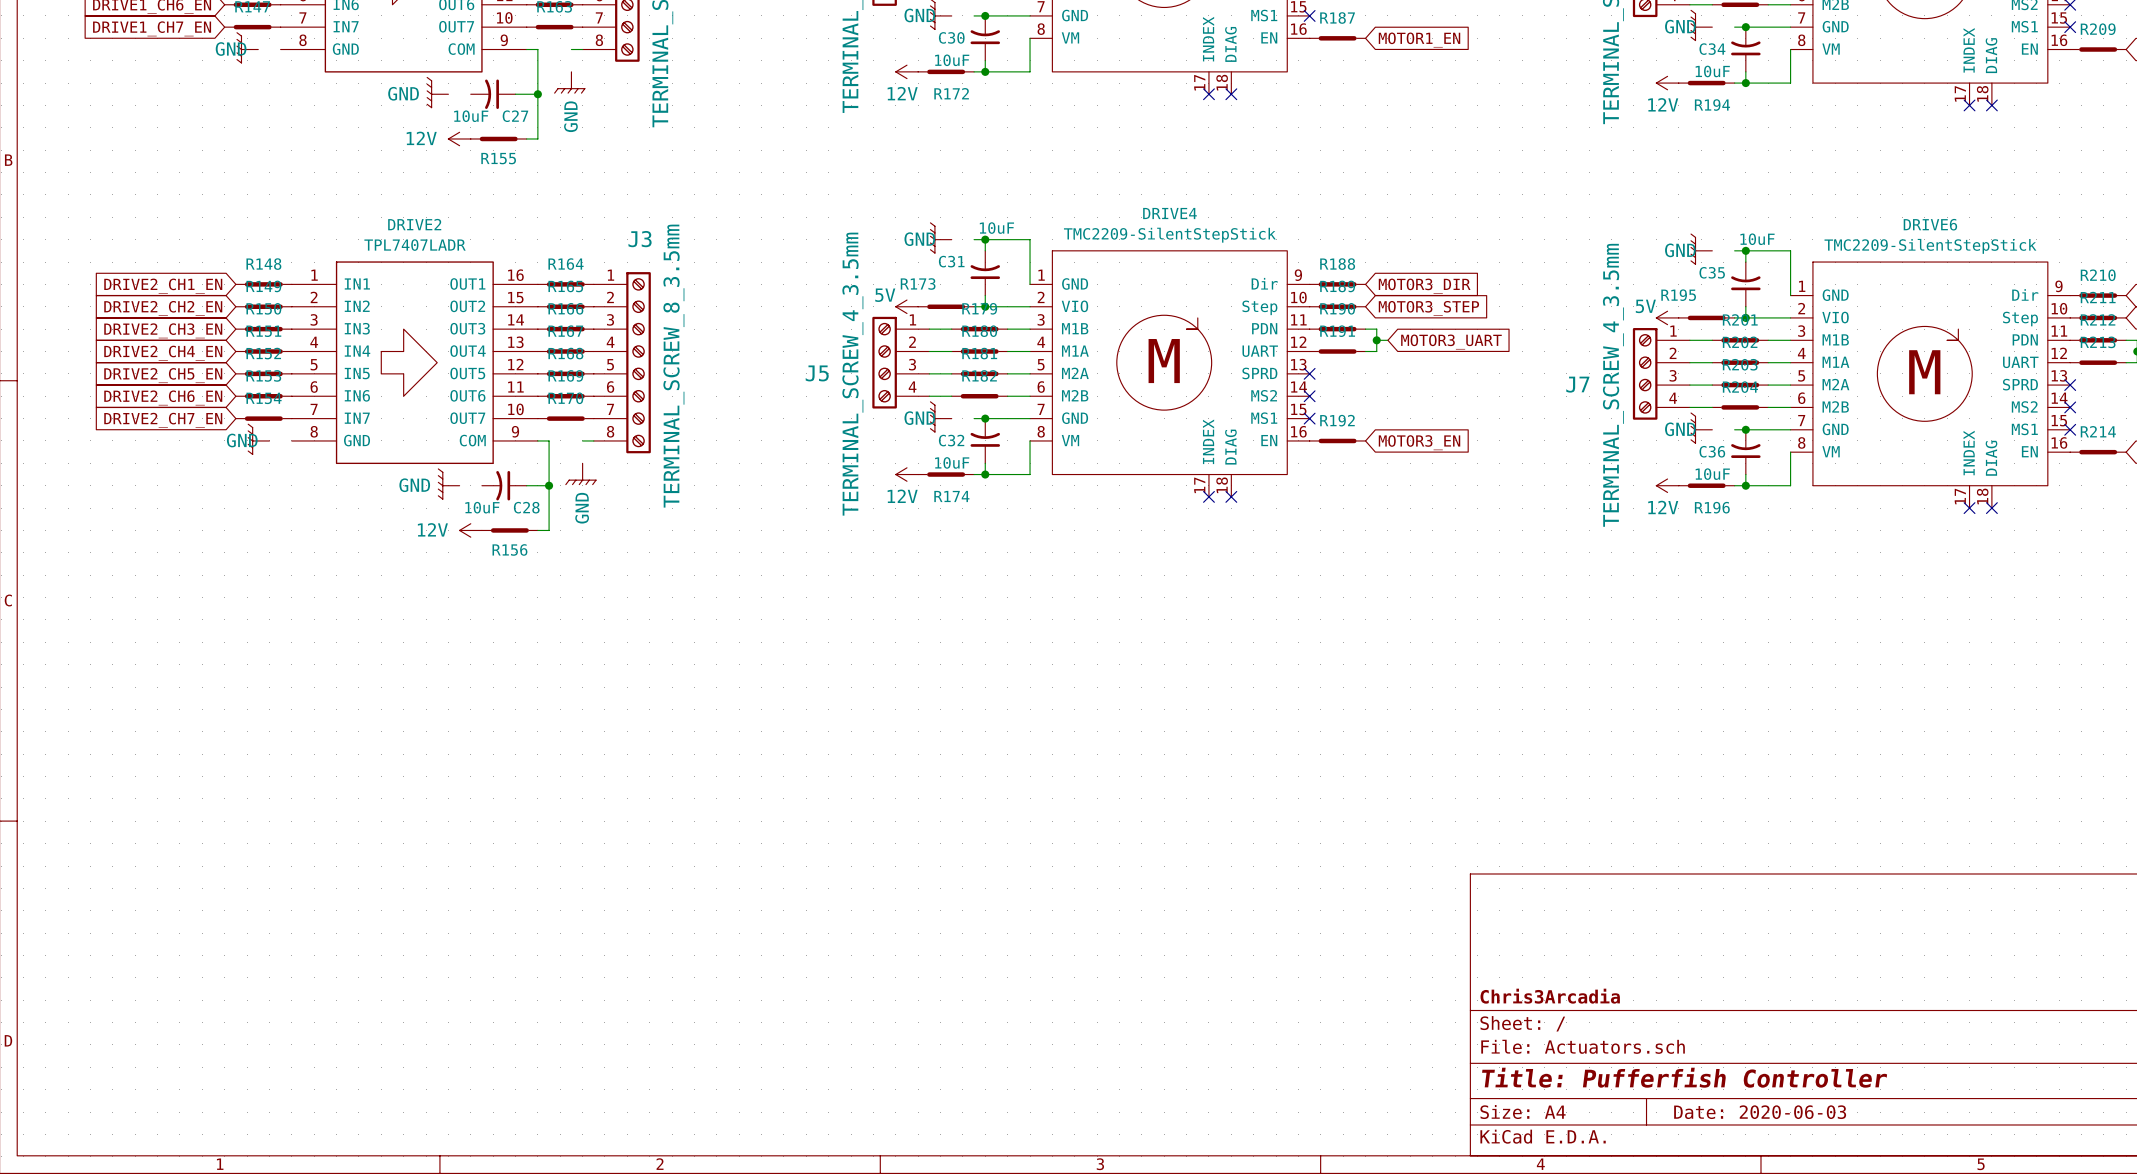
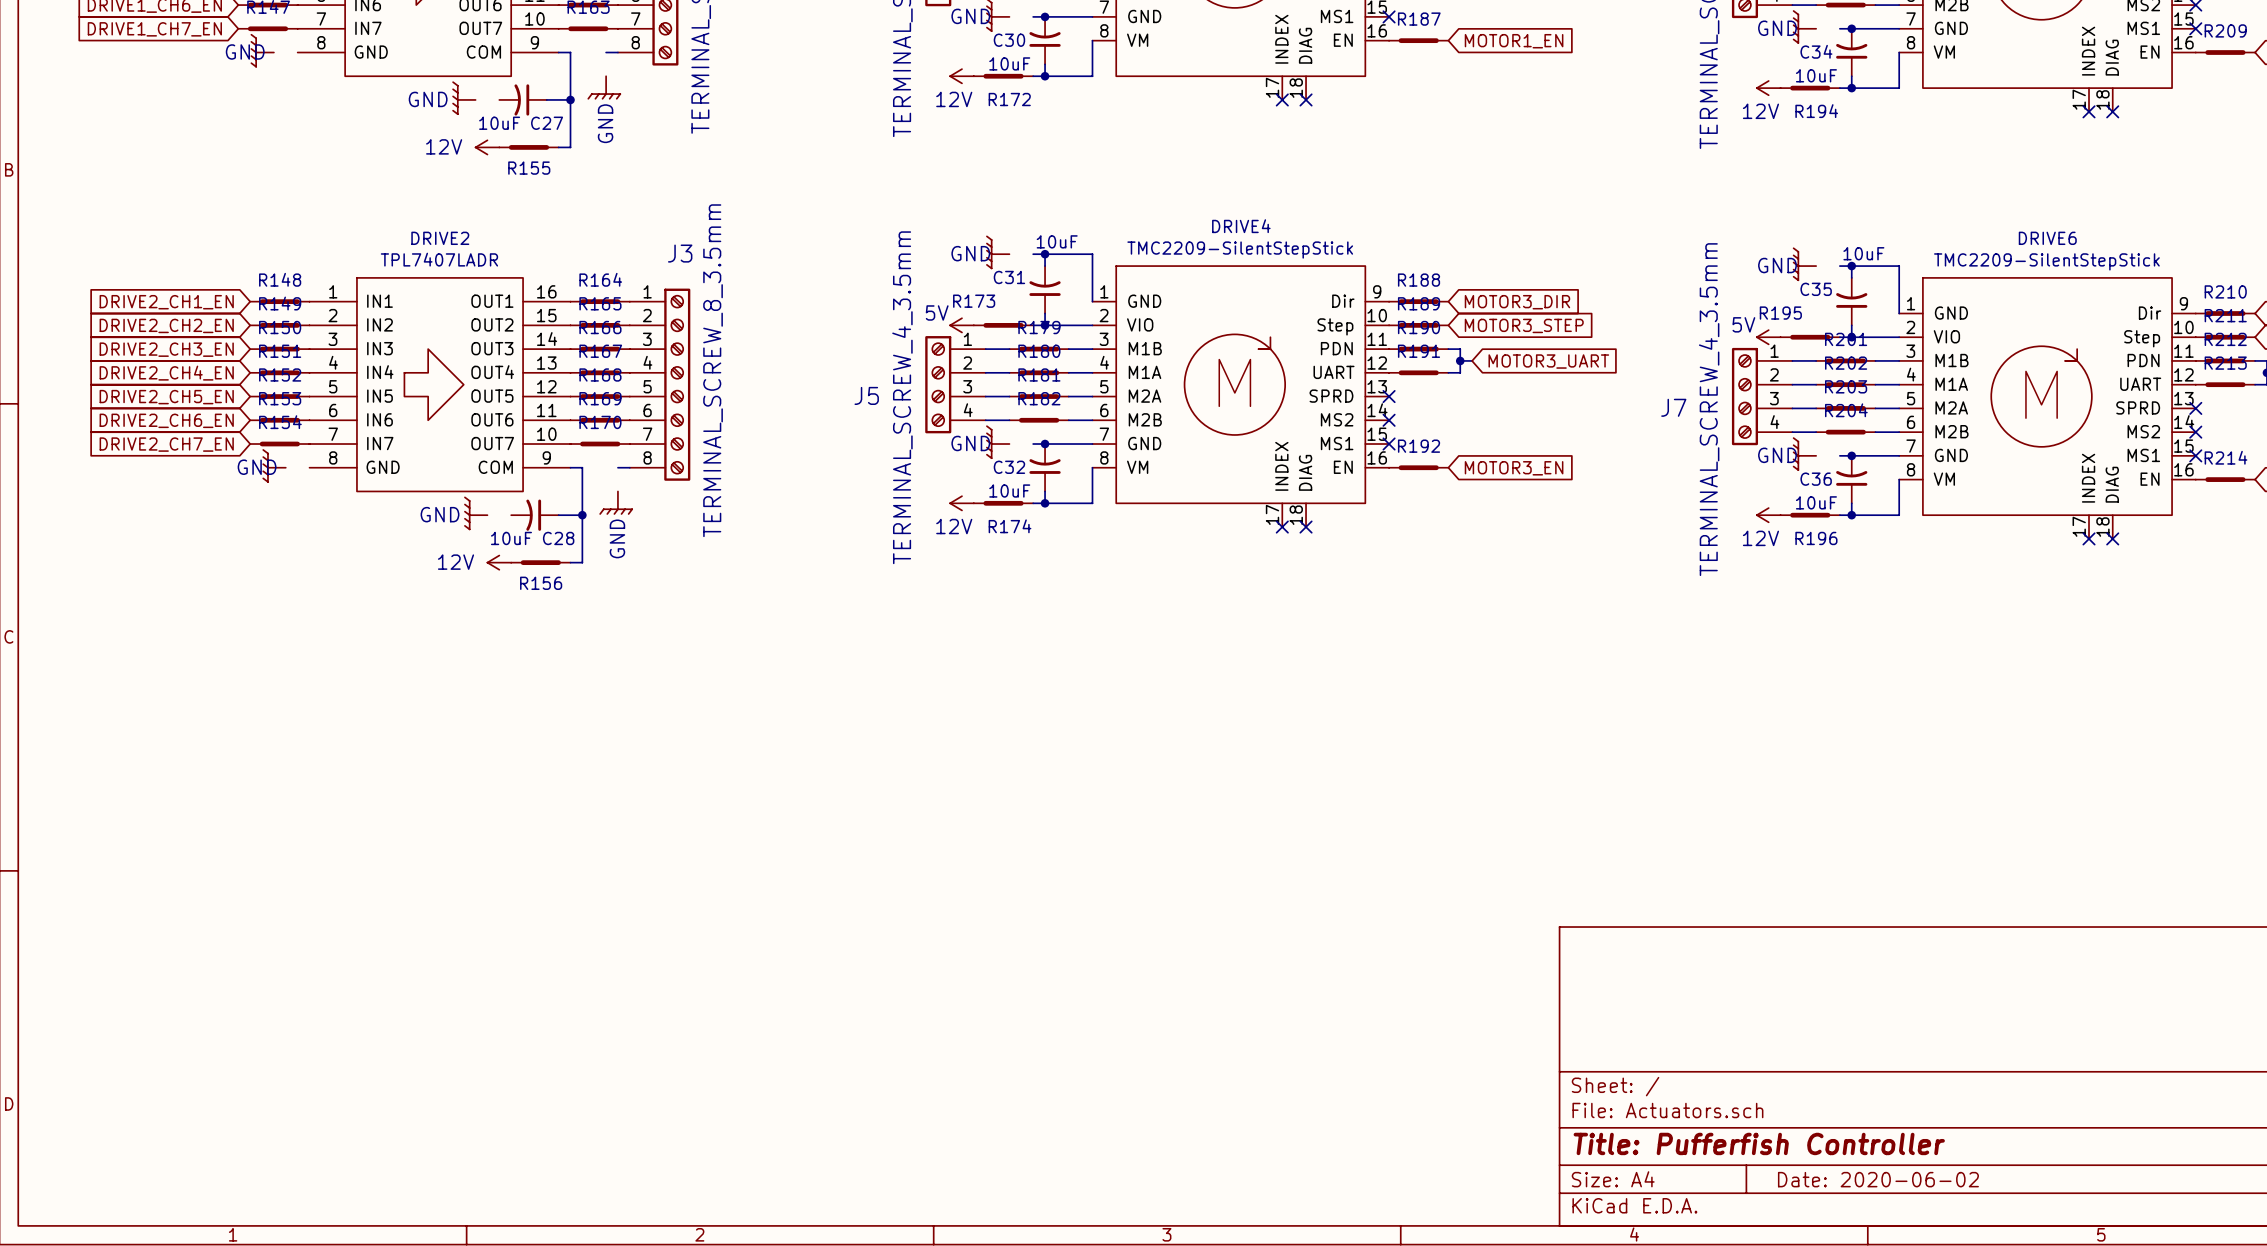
title block: Chris3Arcadia (1550, 996) -> none
title block: Date: 2020-06-03 (1760, 1112) -> Date: 2020-06-02 (1878, 1179)

